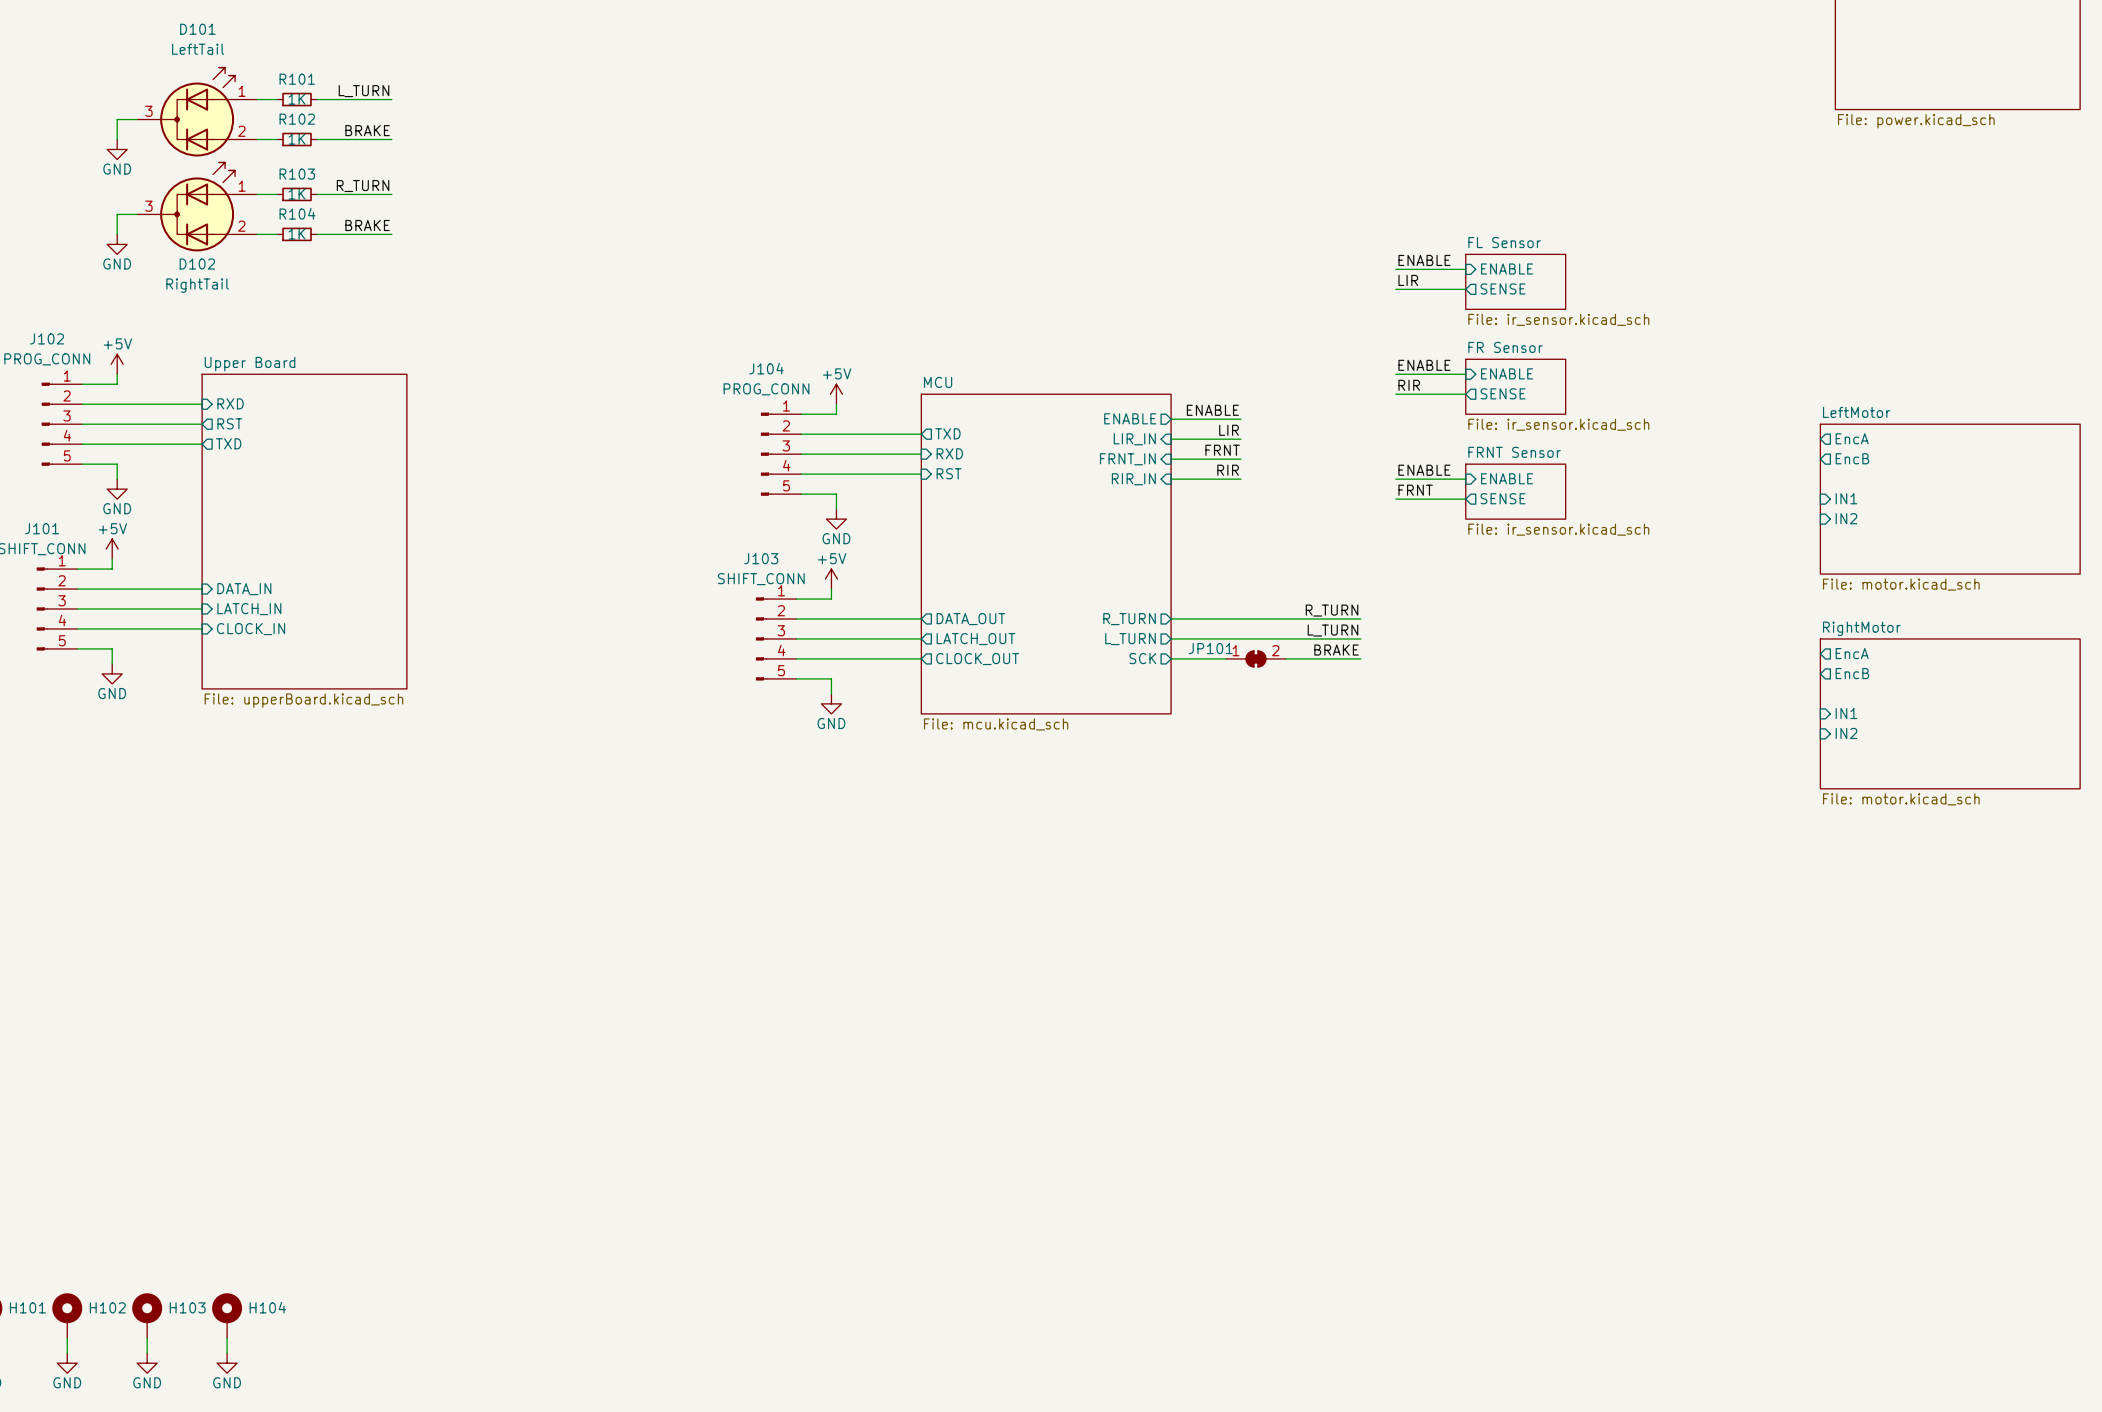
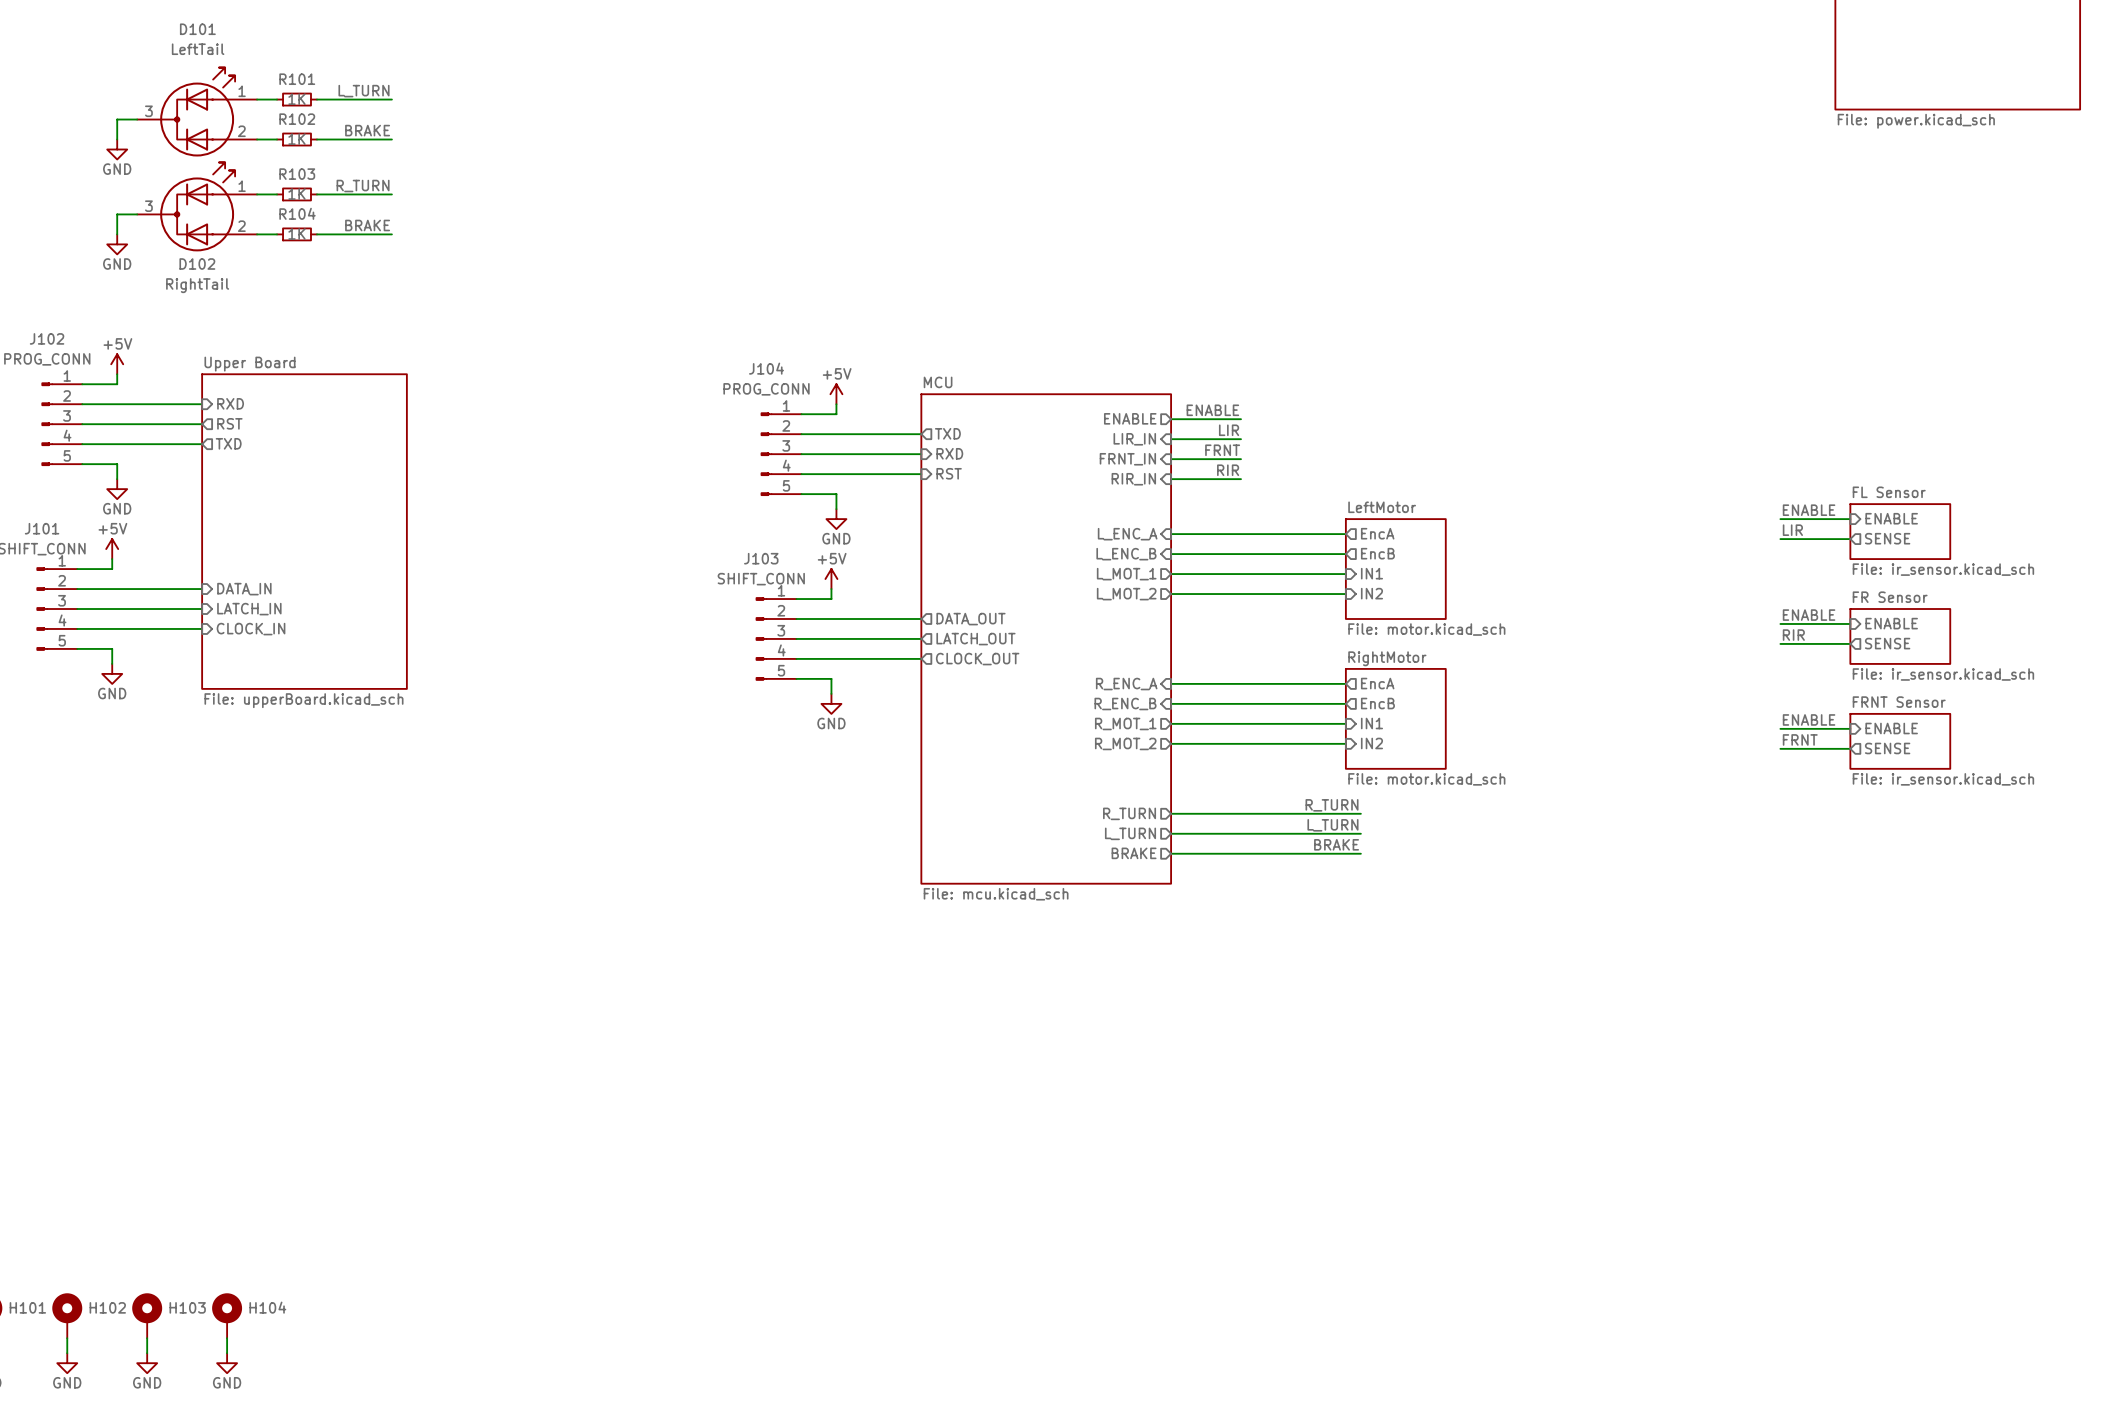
label: ENABLE (1424, 260) -> none
sheet pin: ENABLE (1507, 268) -> none
wire: (1395, 269) (1465, 269) -> none
label: LIR (1408, 280) -> none
sheet FL Sensor: File: ir_sensor.kicad_sch (1515, 281) -> none
sheet pin: SENSE (1503, 288) -> none
wire: (1395, 289) (1465, 289) -> none
label: ENABLE (1424, 365) -> none
sheet pin: ENABLE (1507, 373) -> none
wire: (1395, 374) (1465, 374) -> none
label: RIR (1409, 385) -> none
sheet FR Sensor: File: ir_sensor.kicad_sch (1515, 386) -> none
sheet pin: SENSE (1503, 393) -> none
wire: (1395, 394) (1465, 394) -> none
sheet pin: EncA (1852, 438) -> none
sheet pin: EncB (1852, 458) -> none
label: ENABLE (1424, 470) -> none
sheet pin: ENABLE (1507, 478) -> none
wire: (1395, 479) (1465, 479) -> none
label: FRNT (1415, 490) -> none
sheet FRNT Sensor: File: ir_sensor.kicad_sch (1515, 491) -> none
sheet pin: SENSE (1503, 498) -> none
sheet pin: IN1 (1846, 498) -> none
wire: (1395, 499) (1465, 499) -> none
sheet LeftMotor: File: motor.kicad_sch (1950, 499) -> none
label: none -> ENABLE (1809, 510)
sheet pin: IN2 (1846, 518) -> none
sheet pin: none -> ENABLE (1891, 518)
wire: none -> (1780, 519) (1850, 519)
label: none -> LIR (1792, 530)
sheet FL Sensor: none -> File: ir_sensor.kicad_sch (1900, 531)
sheet pin: none -> EncA (1377, 533)
sheet pin: none -> L_ENC_A (1127, 534)
wire: none -> (1171, 534) (1345, 534)
sheet pin: none -> SENSE (1887, 538)
wire: none -> (1780, 539) (1850, 539)
sheet pin: none -> EncB (1377, 553)
sheet MCU: File: mcu.kicad_sch (1046, 554) -> none
sheet pin: none -> L_ENC_B (1126, 554)
wire: none -> (1171, 554) (1345, 554)
sheet LeftMotor: none -> File: motor.kicad_sch (1395, 569)
sheet pin: none -> IN1 (1371, 573)
sheet pin: none -> L_MOT_1 (1126, 574)
wire: none -> (1171, 574) (1345, 574)
sheet pin: none -> IN2 (1371, 593)
sheet pin: none -> L_MOT_2 (1126, 594)
wire: none -> (1171, 594) (1345, 594)
label position: R_TURN (1332, 610) -> R_TURN (1332, 805)
label: none -> ENABLE (1809, 615)
wire: (1171, 618) (1360, 618) -> (1171, 813) (1360, 813)
sheet pin position: R_TURN (1129, 619) -> R_TURN (1129, 813)
wire: none -> (1780, 623) (1850, 623)
sheet pin: none -> ENABLE (1891, 623)
label position: L_TURN (1332, 630) -> L_TURN (1332, 825)
label: none -> RIR (1793, 635)
sheet FR Sensor: none -> File: ir_sensor.kicad_sch (1900, 636)
sheet MCU: none -> File: mcu.kicad_sch (1046, 638)
wire: (1171, 638) (1360, 638) -> (1171, 833) (1360, 833)
sheet pin position: L_TURN (1130, 639) -> L_TURN (1130, 833)
wire: none -> (1780, 643) (1850, 643)
sheet pin: none -> SENSE (1887, 643)
label position: BRAKE (1336, 650) -> BRAKE (1336, 844)
sheet pin: EncA (1852, 653) -> none
sheet pin: SCK (1142, 658) -> none
wire: (1171, 658) (1226, 658) -> none
JP101: (1255, 658) -> none
wire: (1285, 658) (1360, 658) -> none
sheet pin: EncB (1852, 673) -> none
wire: none -> (1171, 683) (1345, 683)
sheet pin: none -> EncA (1377, 683)
sheet pin: none -> R_ENC_A (1126, 684)
wire: none -> (1171, 703) (1345, 703)
sheet pin: none -> EncB (1377, 703)
sheet pin: none -> R_ENC_B (1125, 704)
sheet pin: IN1 (1846, 713) -> none
sheet RightMotor: File: motor.kicad_sch (1950, 713) -> none
sheet RightMotor: none -> File: motor.kicad_sch (1395, 718)
label: none -> ENABLE (1809, 719)
sheet pin: none -> R_MOT_1 (1125, 723)
wire: none -> (1171, 723) (1345, 723)
sheet pin: none -> IN1 (1371, 723)
wire: none -> (1780, 728) (1850, 728)
sheet pin: none -> ENABLE (1891, 728)
sheet pin: IN2 (1846, 733) -> none
label: none -> FRNT (1800, 739)
sheet FRNT Sensor: none -> File: ir_sensor.kicad_sch (1900, 741)
sheet pin: none -> R_MOT_2 (1125, 743)
wire: none -> (1171, 743) (1345, 743)
sheet pin: none -> IN2 (1371, 743)
wire: none -> (1780, 748) (1850, 748)
sheet pin: none -> SENSE (1887, 748)
sheet pin: none -> BRAKE (1134, 853)
wire: none -> (1171, 853) (1360, 853)

